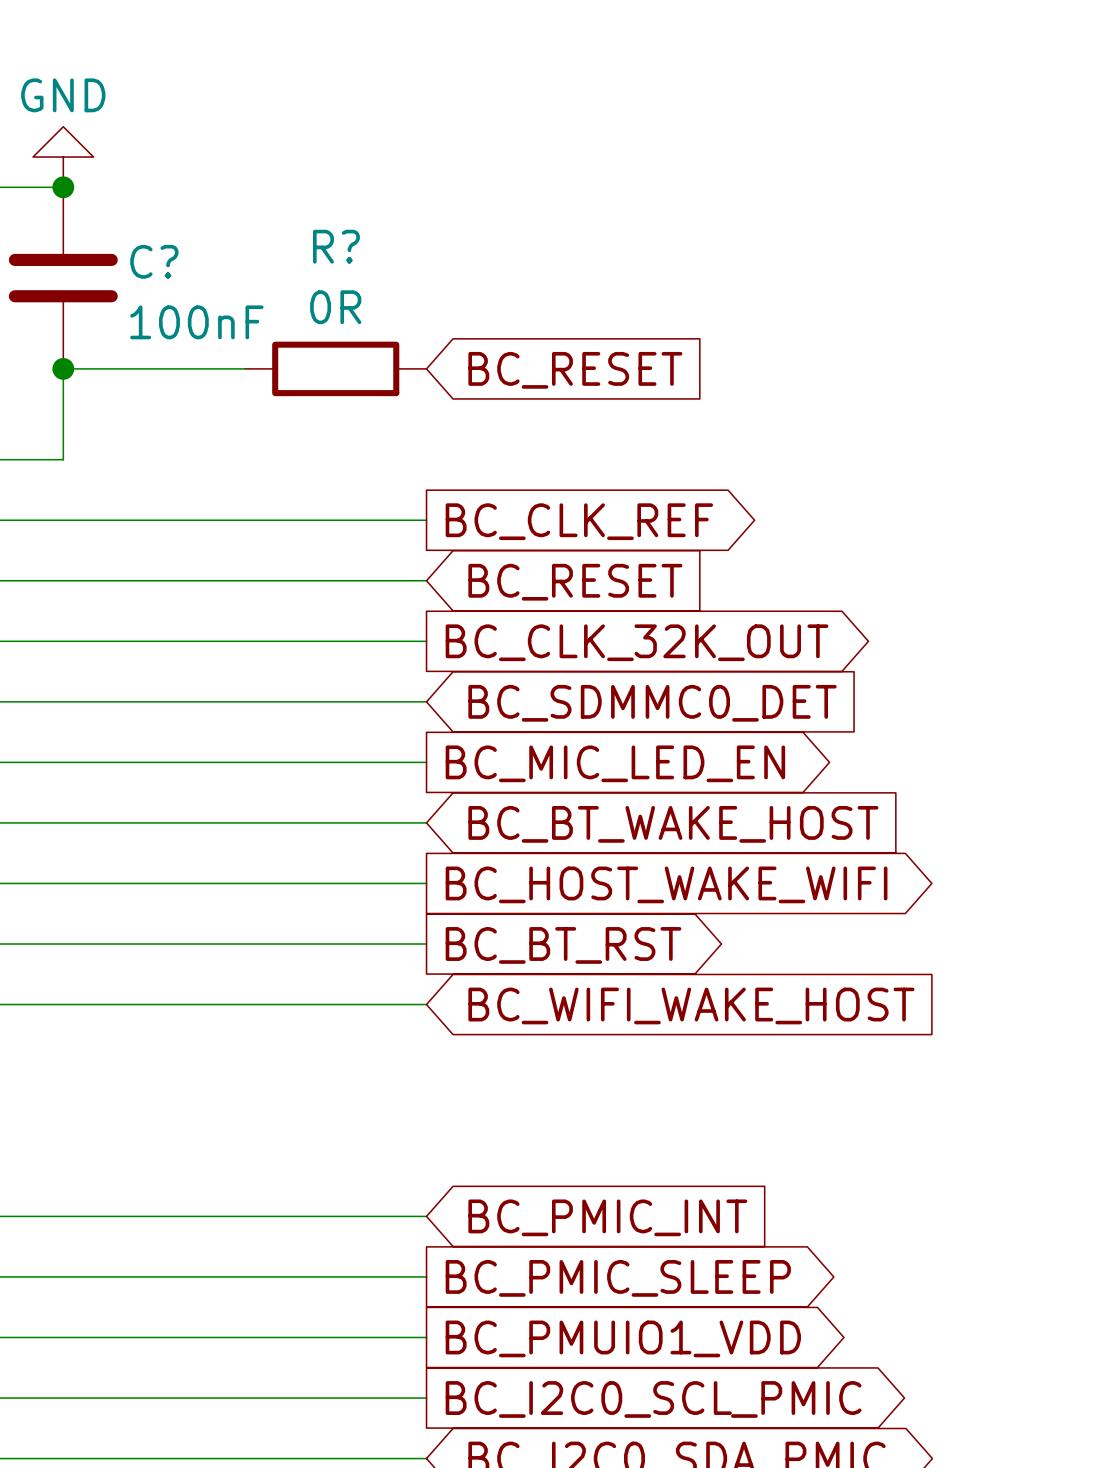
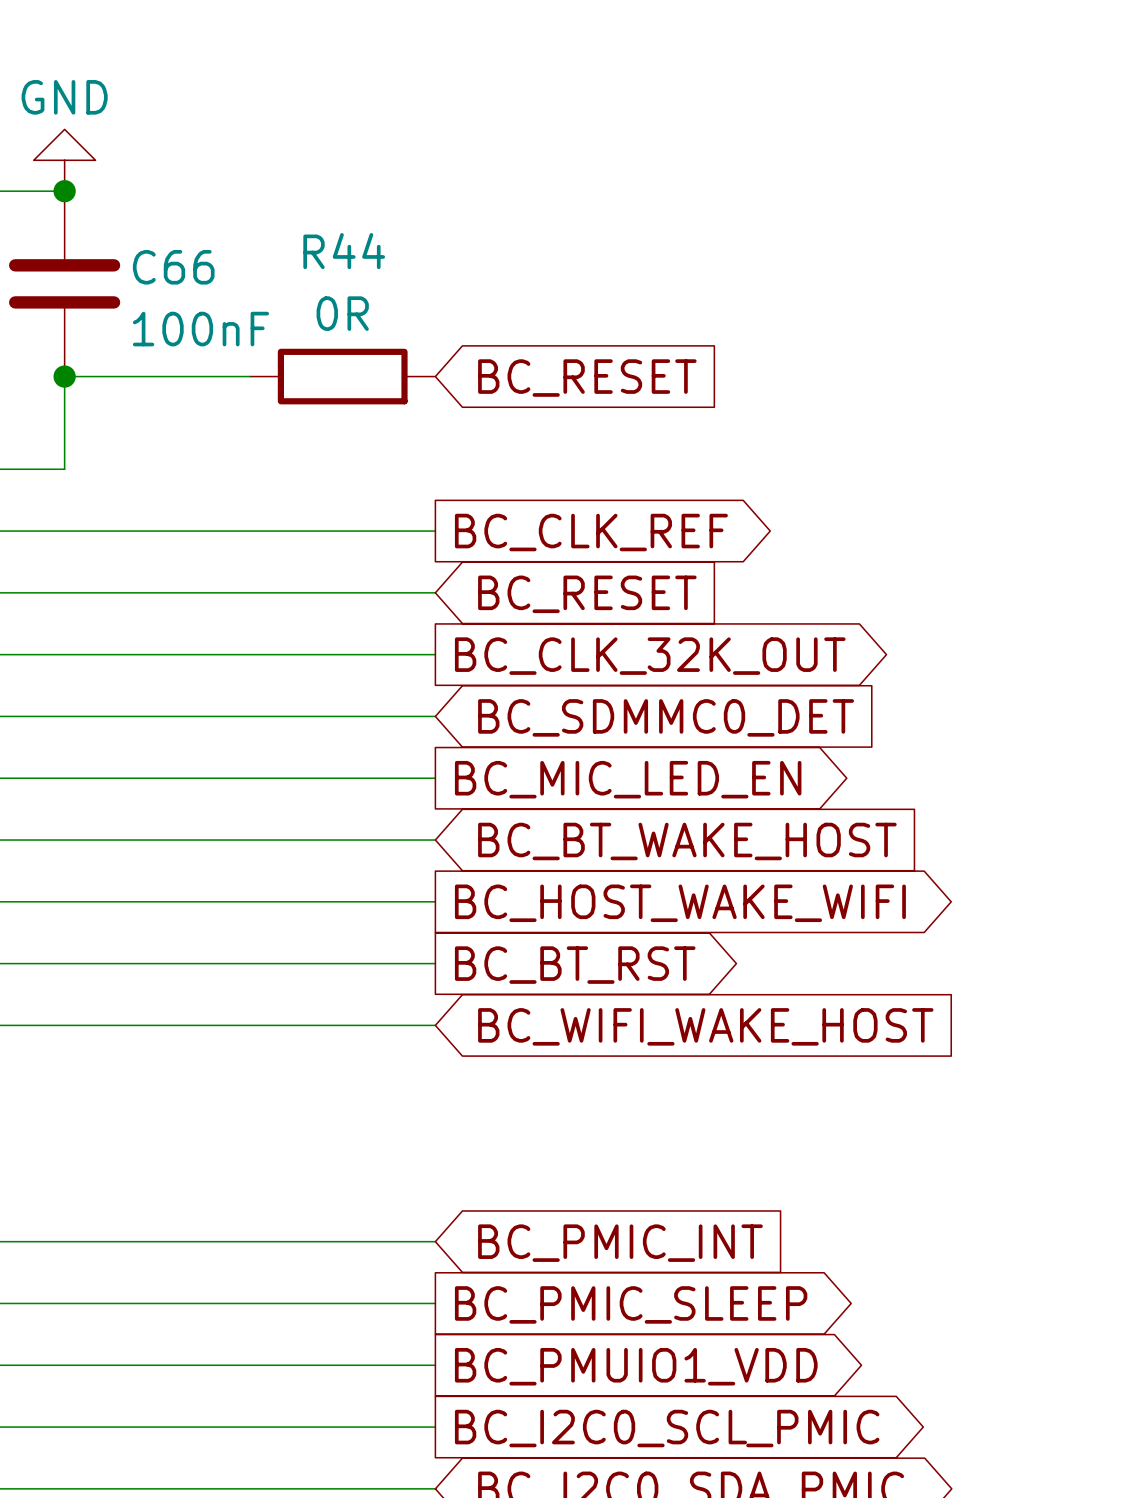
R? name: R? (336, 246) -> R44 (344, 251)
C? name: C? (154, 261) -> C66 (173, 267)

